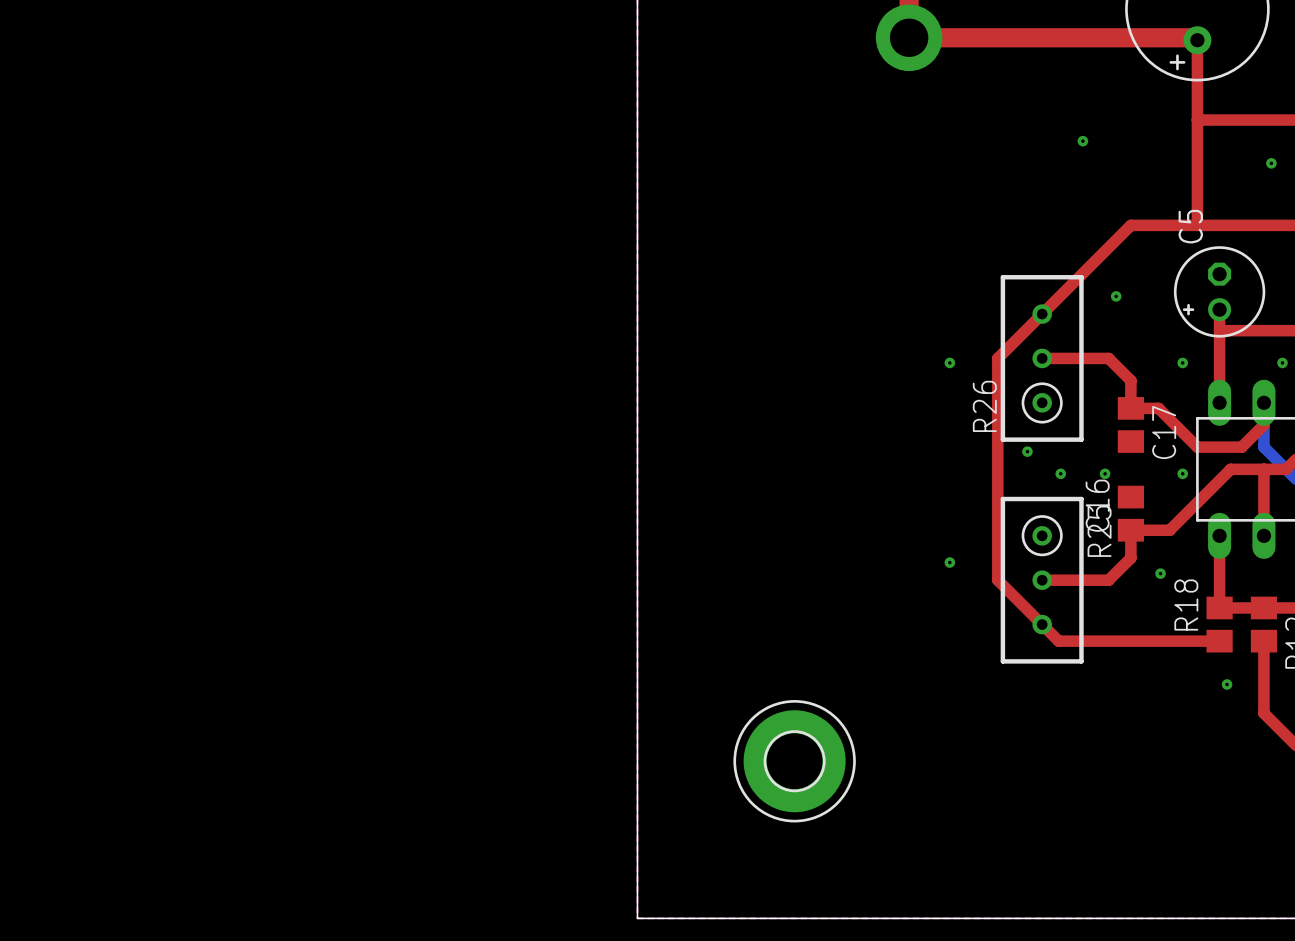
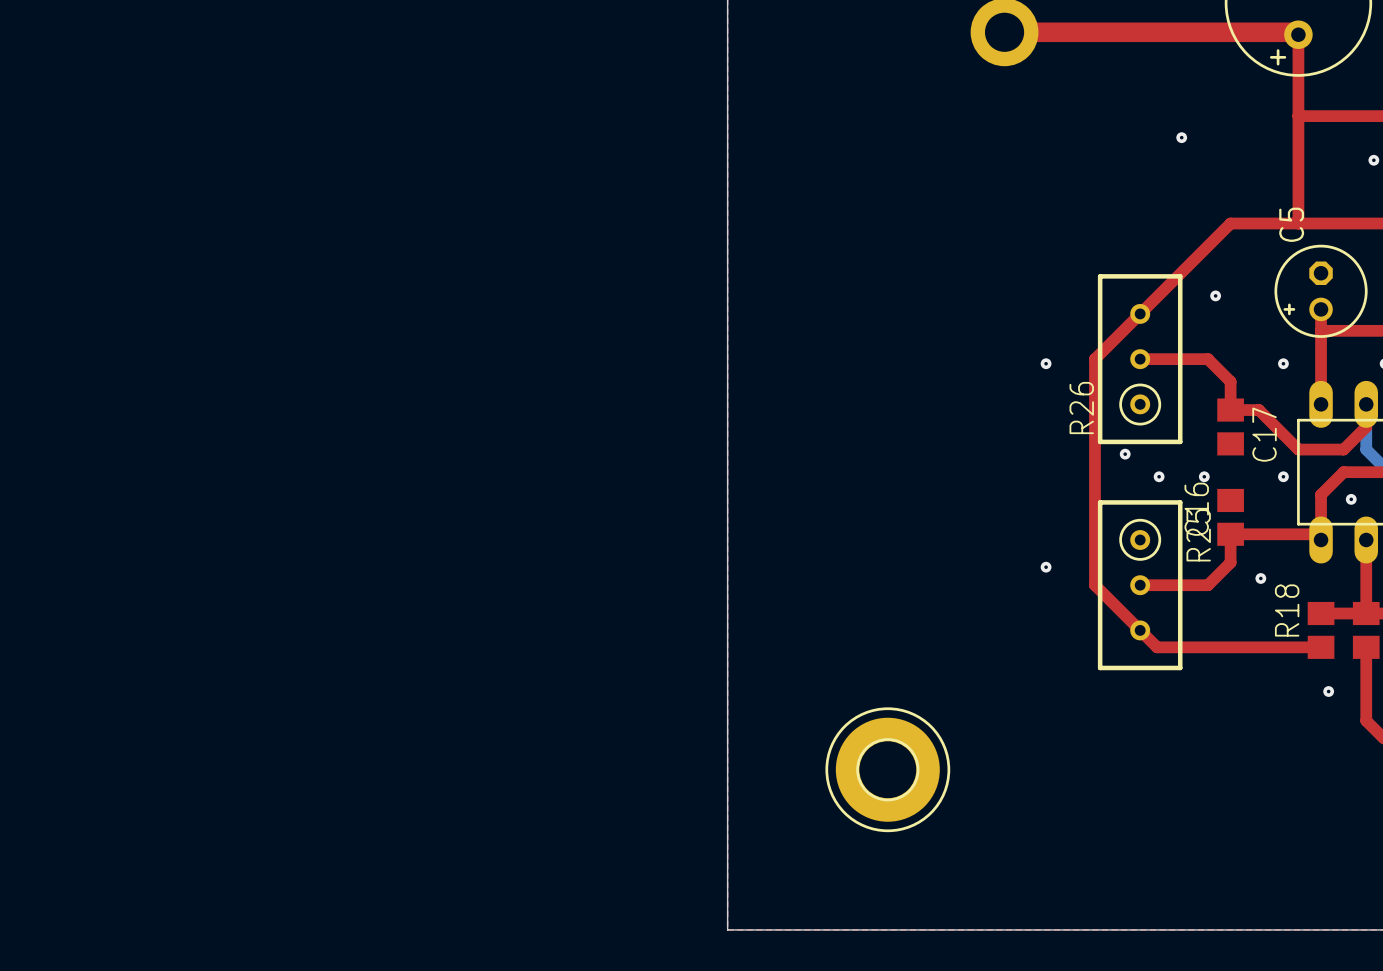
top track: (1241, 469) (1230, 469) (1169, 530) -> (1343, 472) (1321, 494) (1321, 539) (1315, 534) (1270, 534)
top track: (1263, 469) (1263, 535) -> (1366, 613) (1366, 539)
via: none -> (1351, 499)
top track: (1219, 535) (1219, 607) -> none

